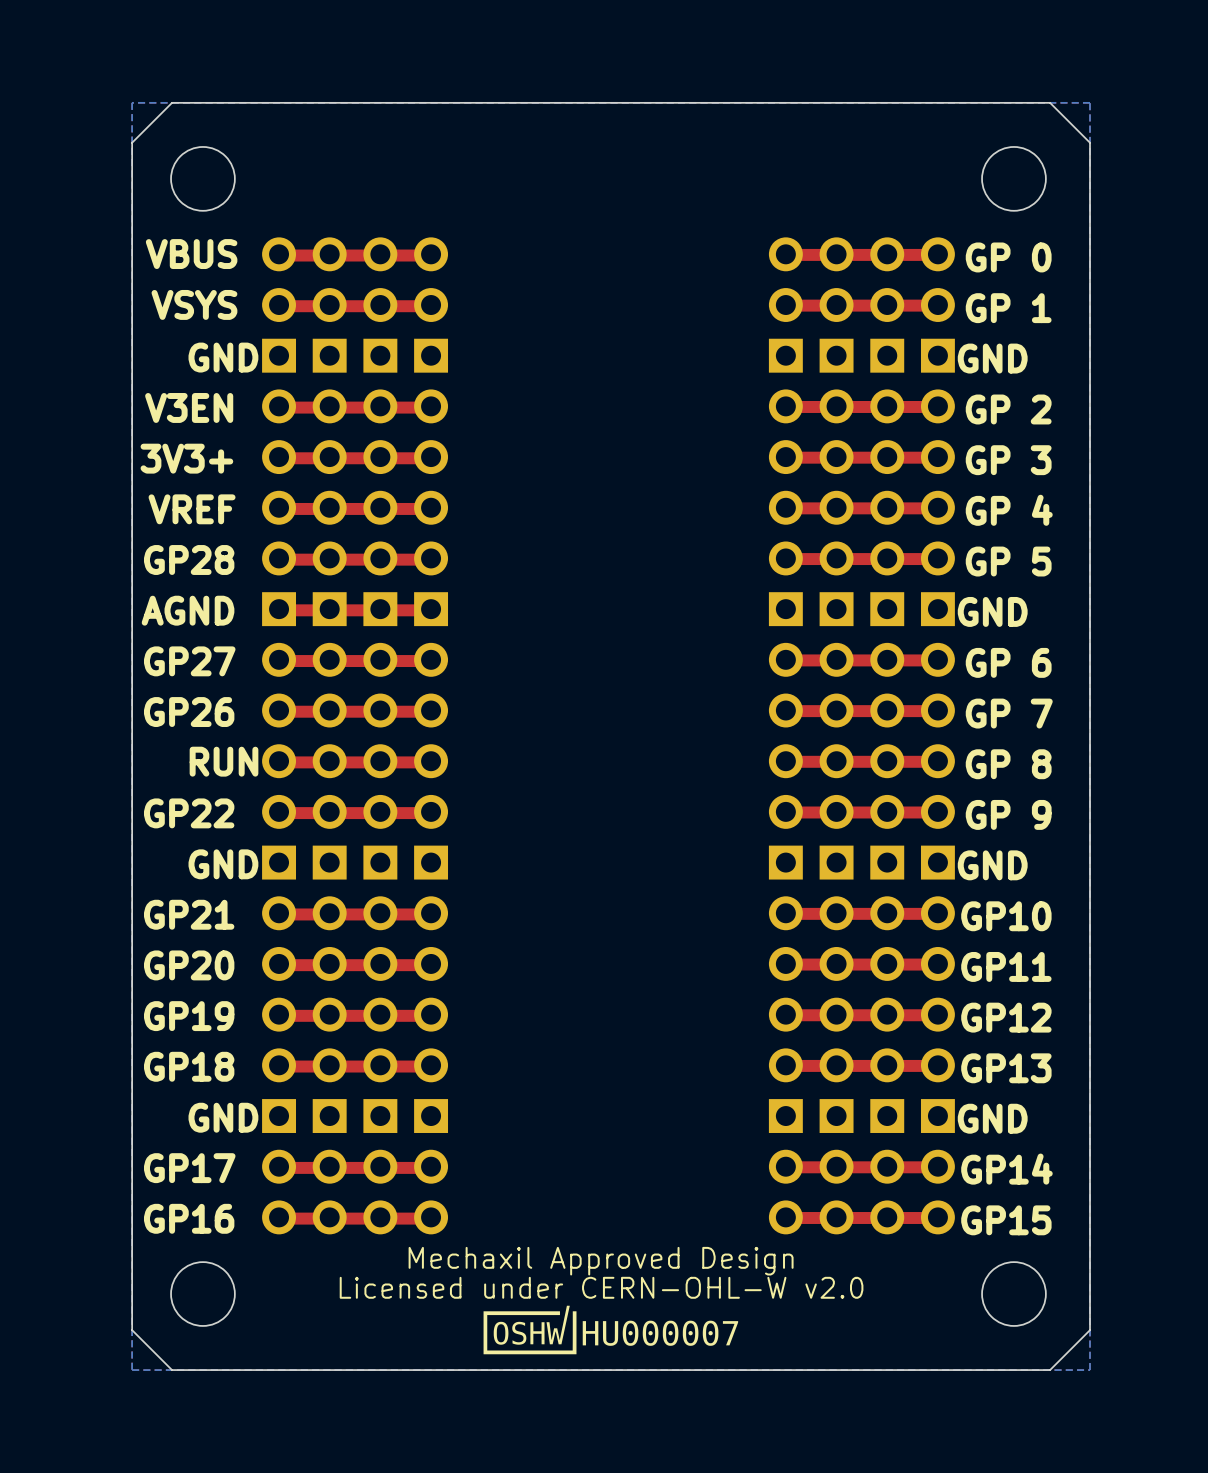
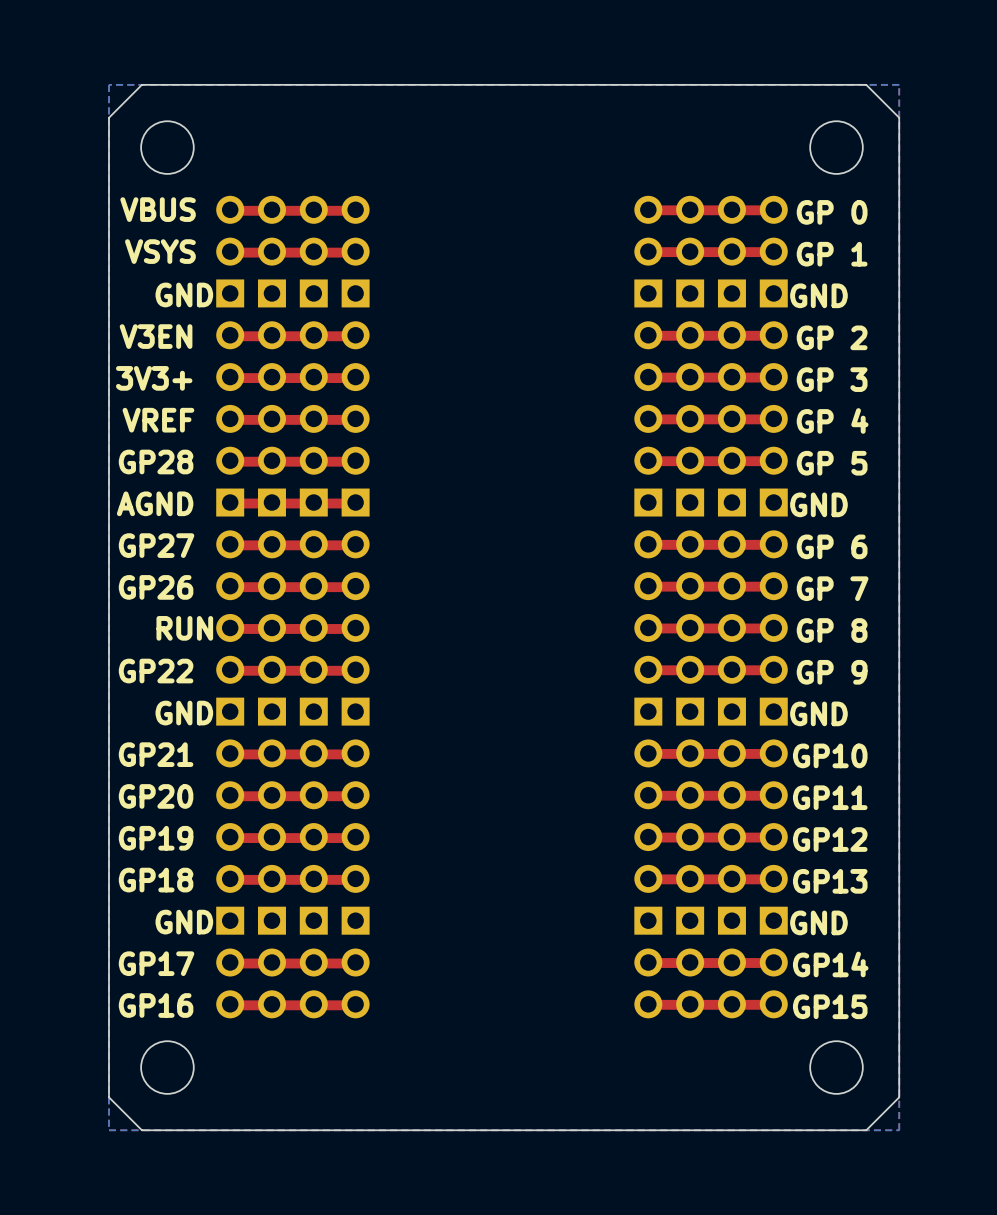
text: Mechaxil Approved Design (601, 1261) -> none
text: Licensed under CERN-OHL-W v2.0 (601, 1287) -> none
drawing: [483, 1305, 739, 1355] -> none

